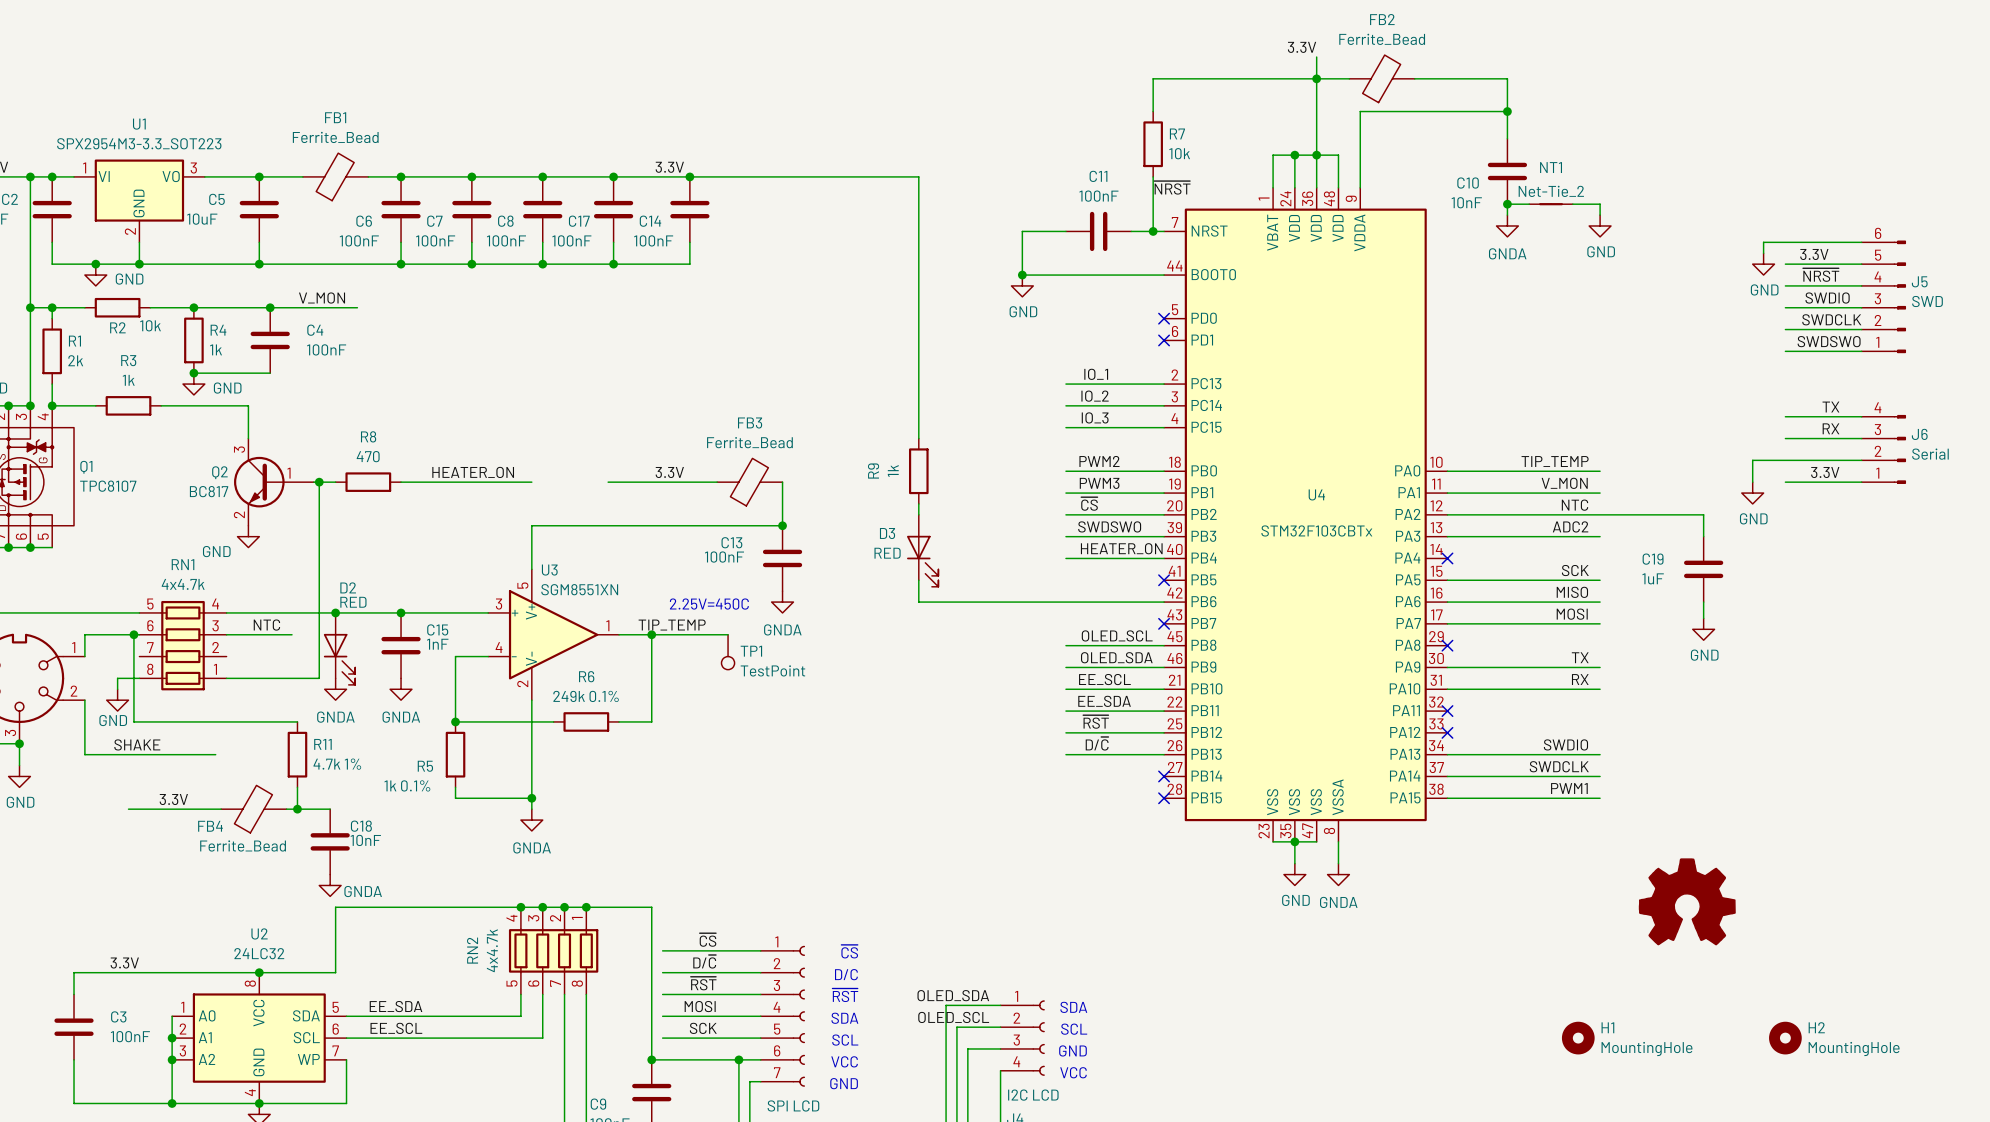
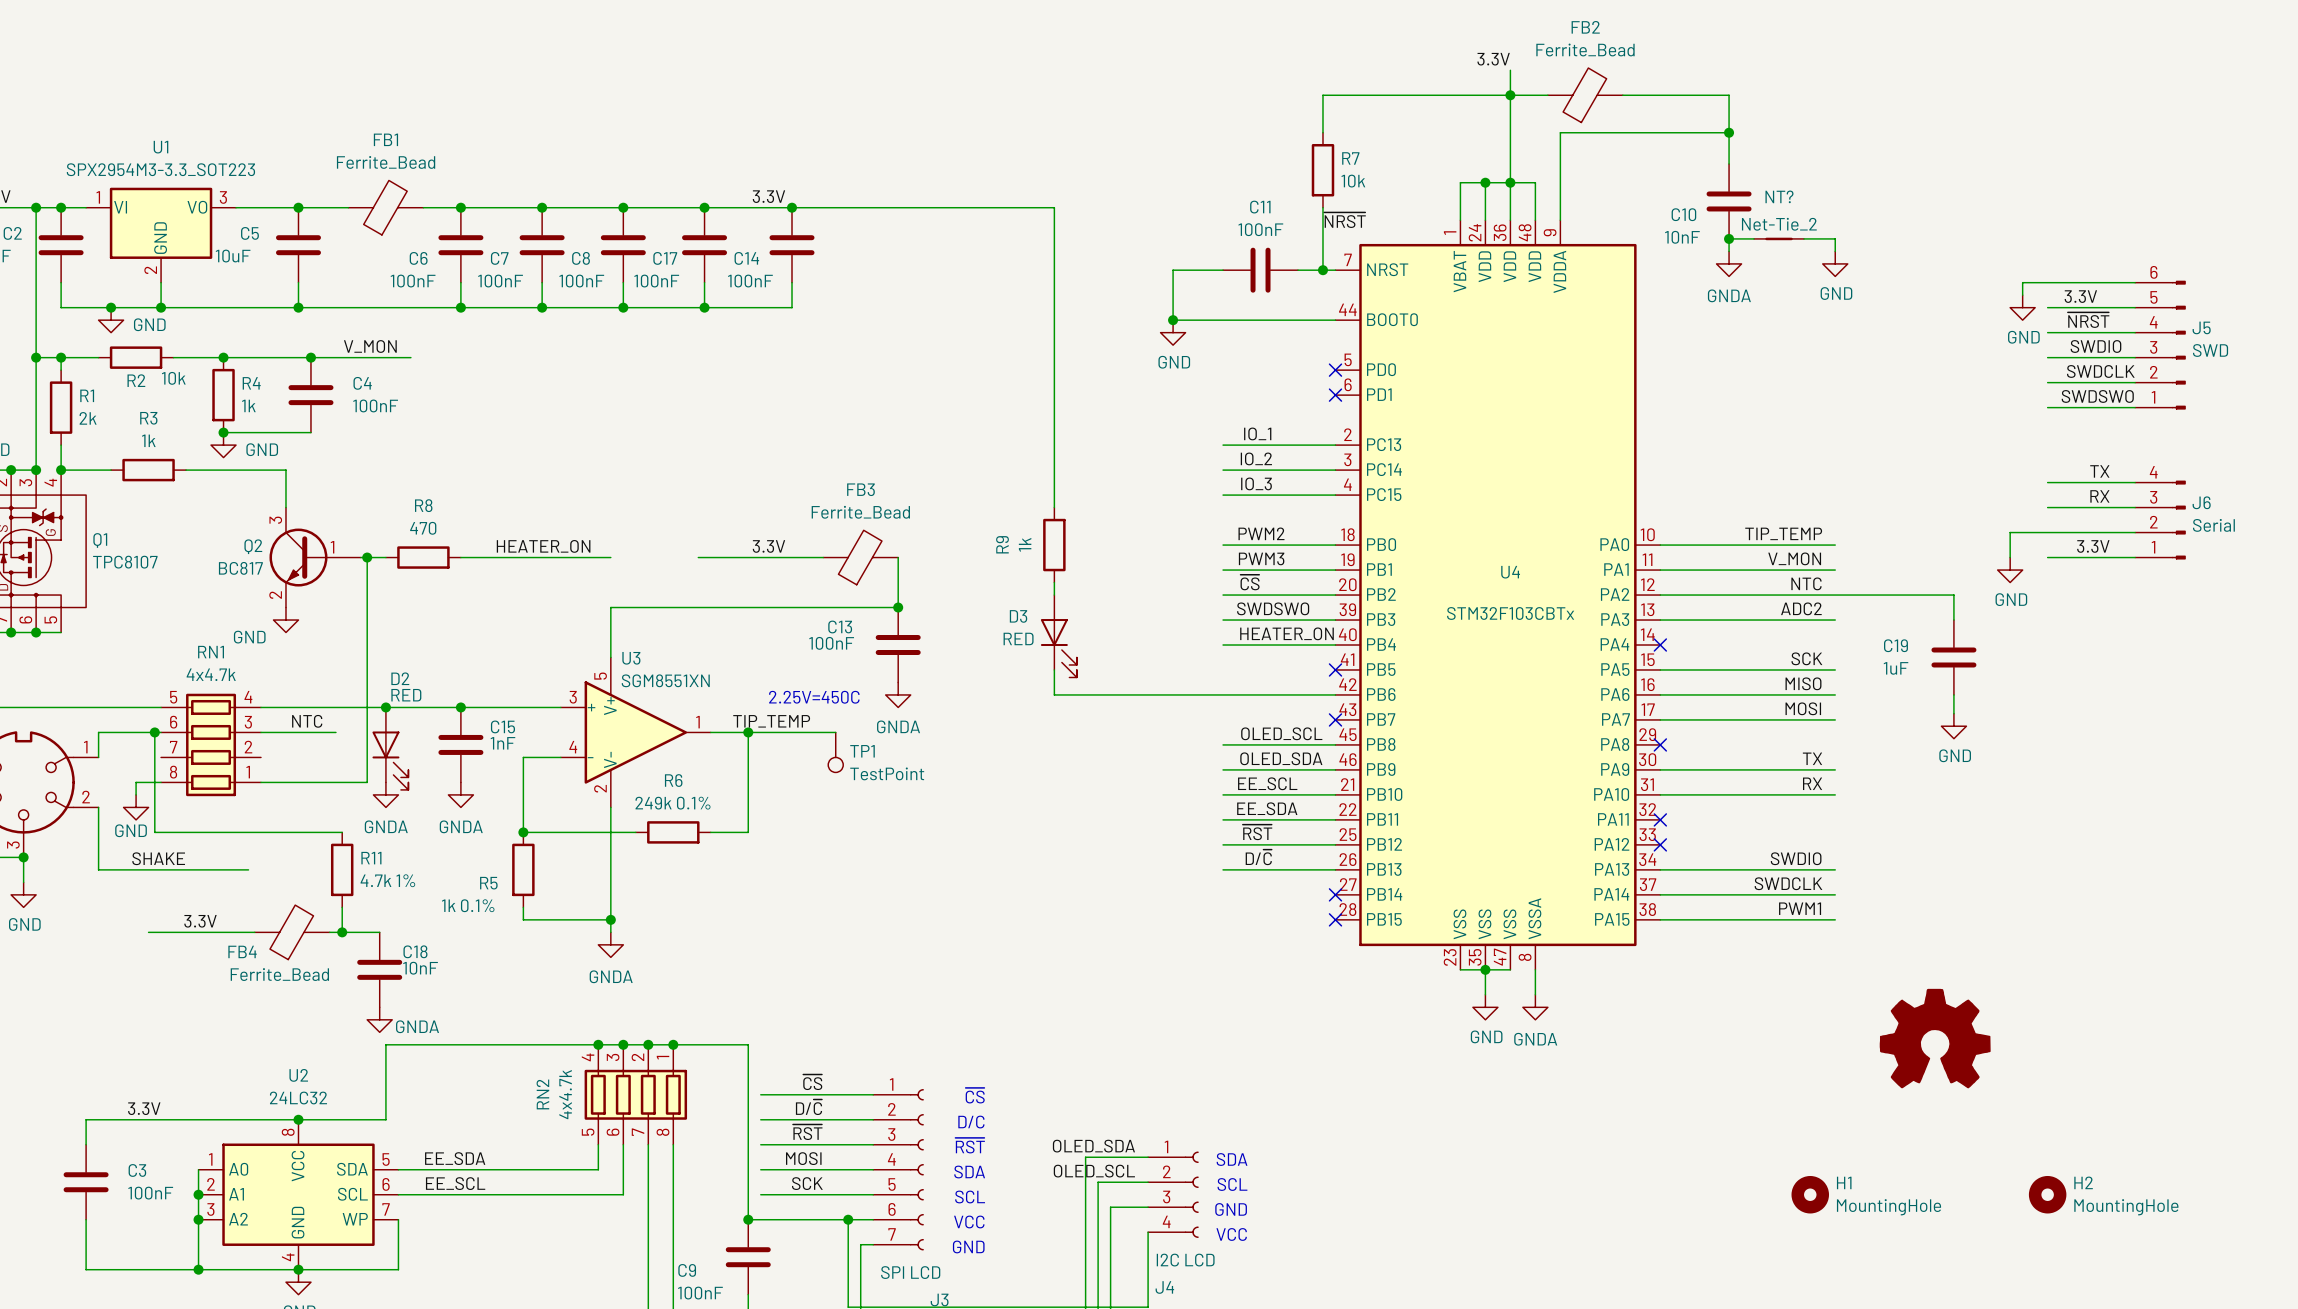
NT1 name: NT1 (1551, 167) -> NT? (1779, 196)

